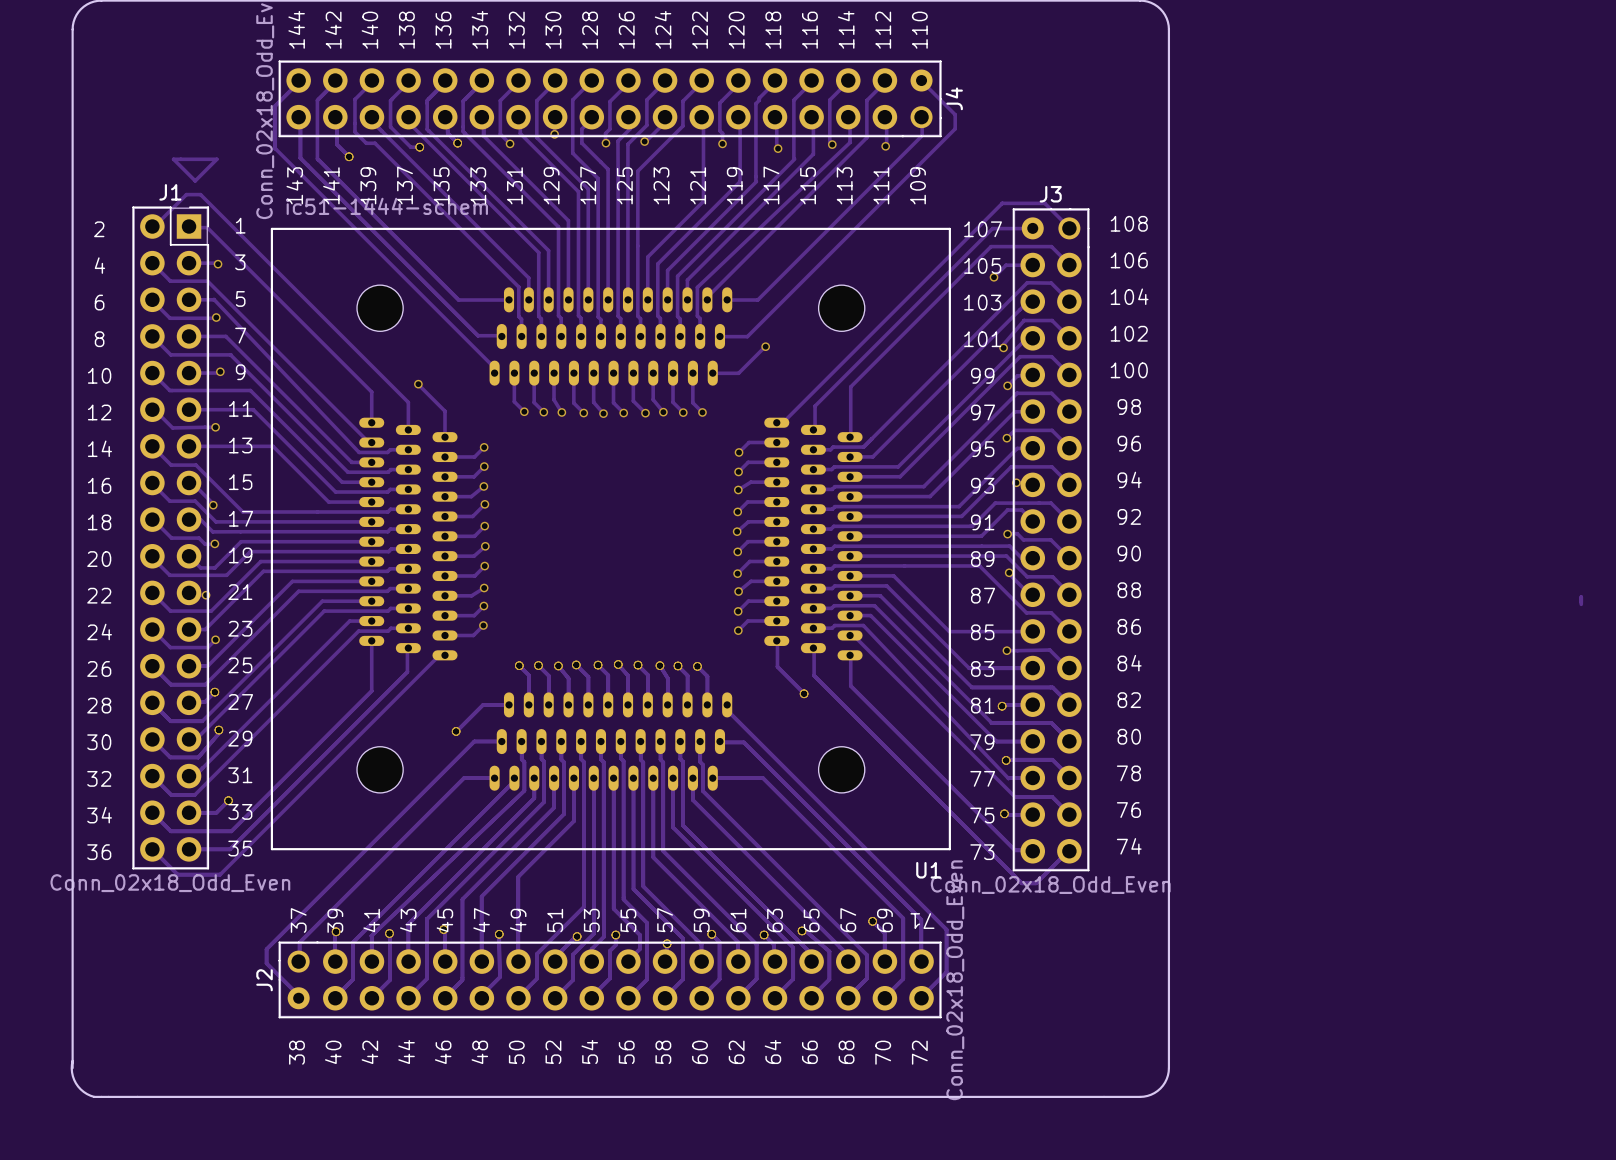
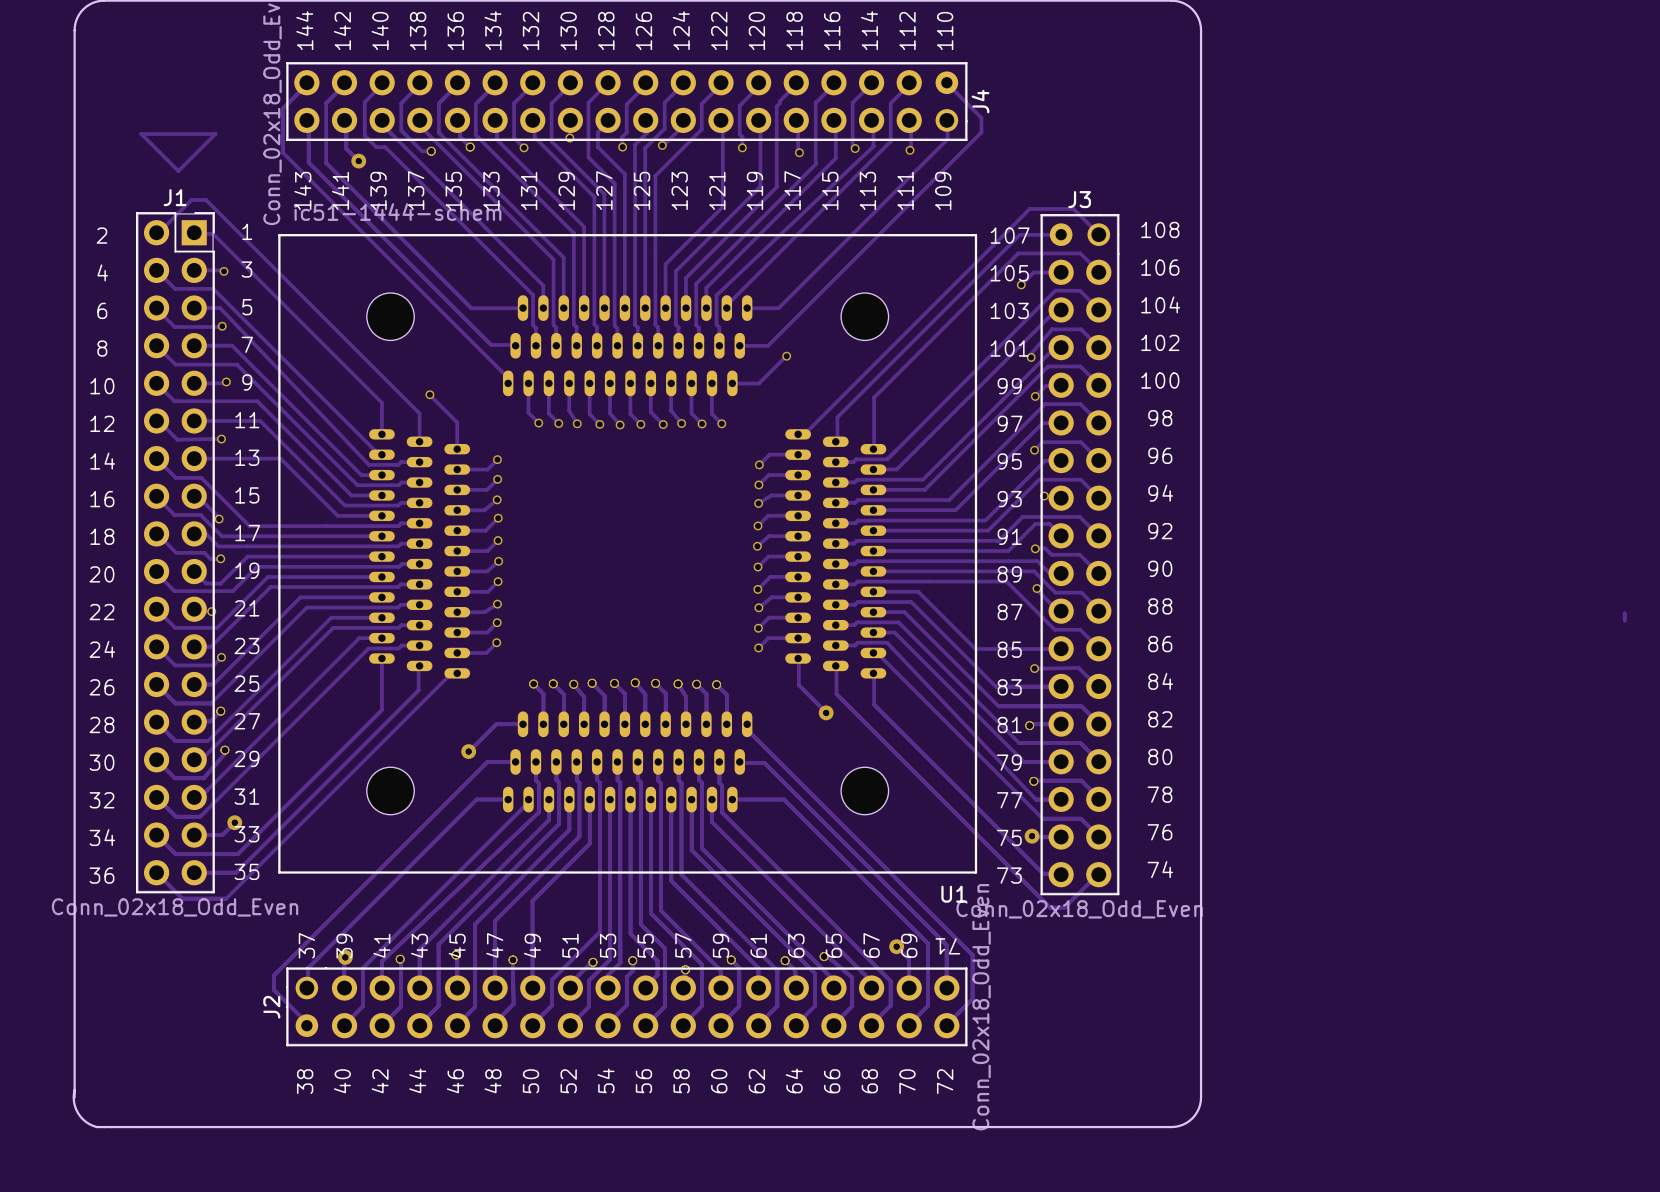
track: none -> (141, 134) (215, 134) (178, 171) (141, 134)
via: none -> (358, 161)
track: (173, 159) (216, 159) (195, 180) (173, 159) -> none
via: none -> (826, 712)
via: none -> (468, 751)
via: none -> (234, 822)
via: none -> (1032, 836)
via: none -> (896, 946)
via: none -> (345, 957)

